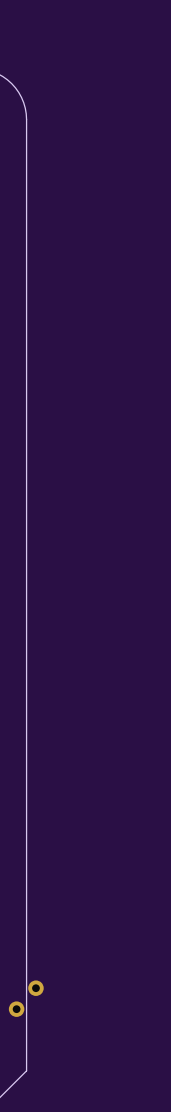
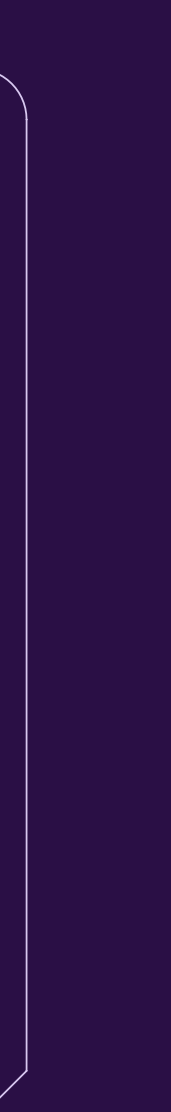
via: (35, 988) -> none
via: (16, 1009) -> none

